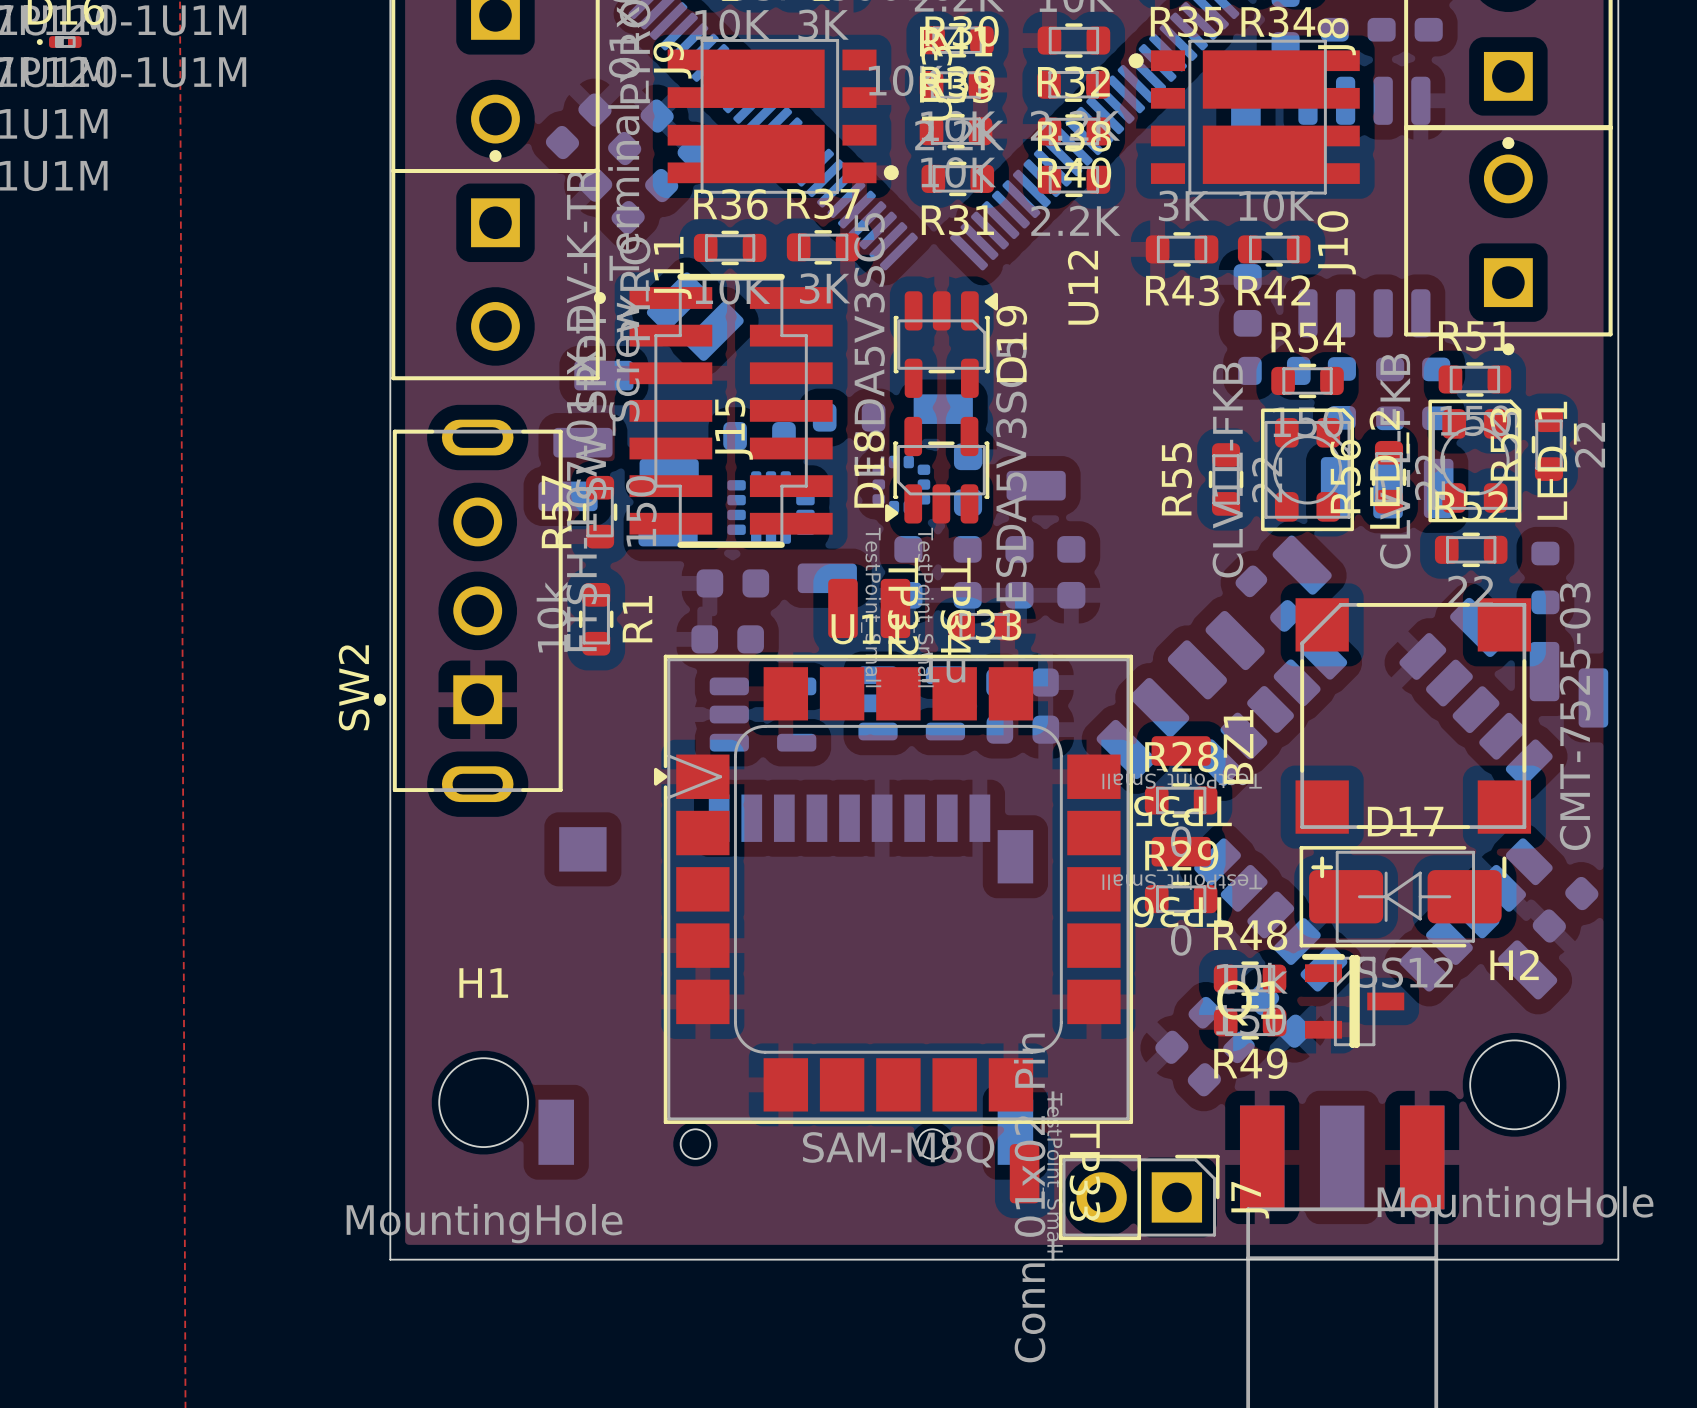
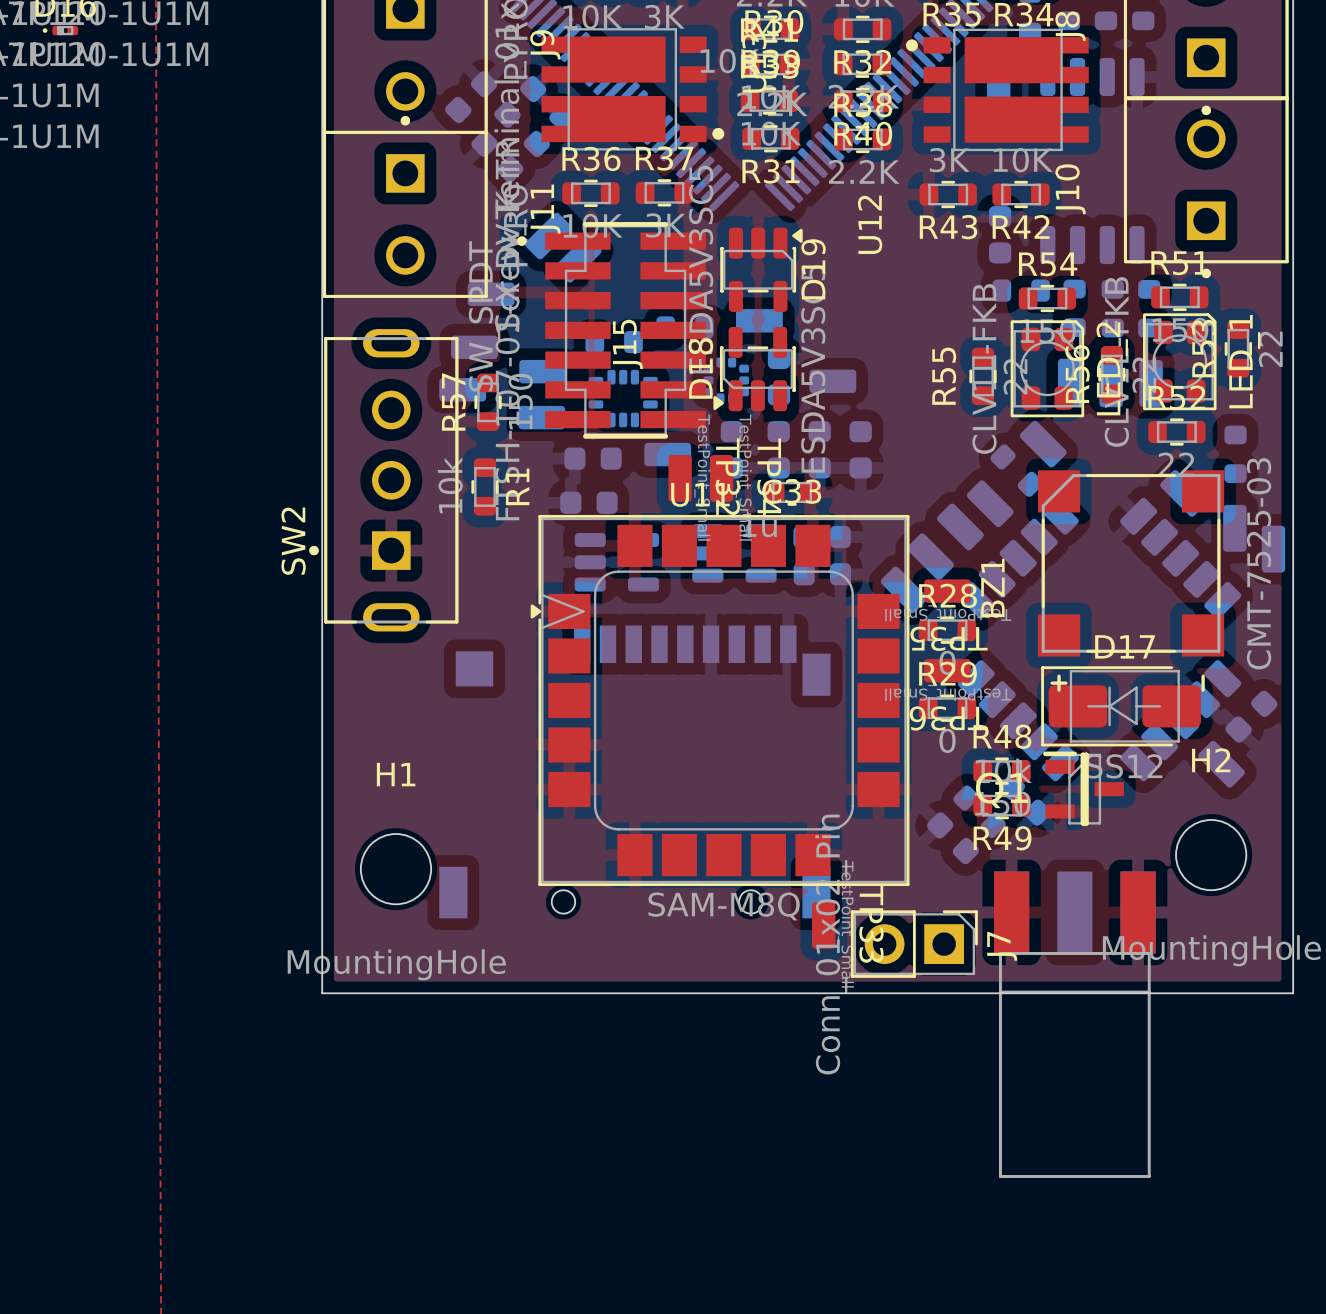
J15 position: (713, 410) -> (611, 330)

